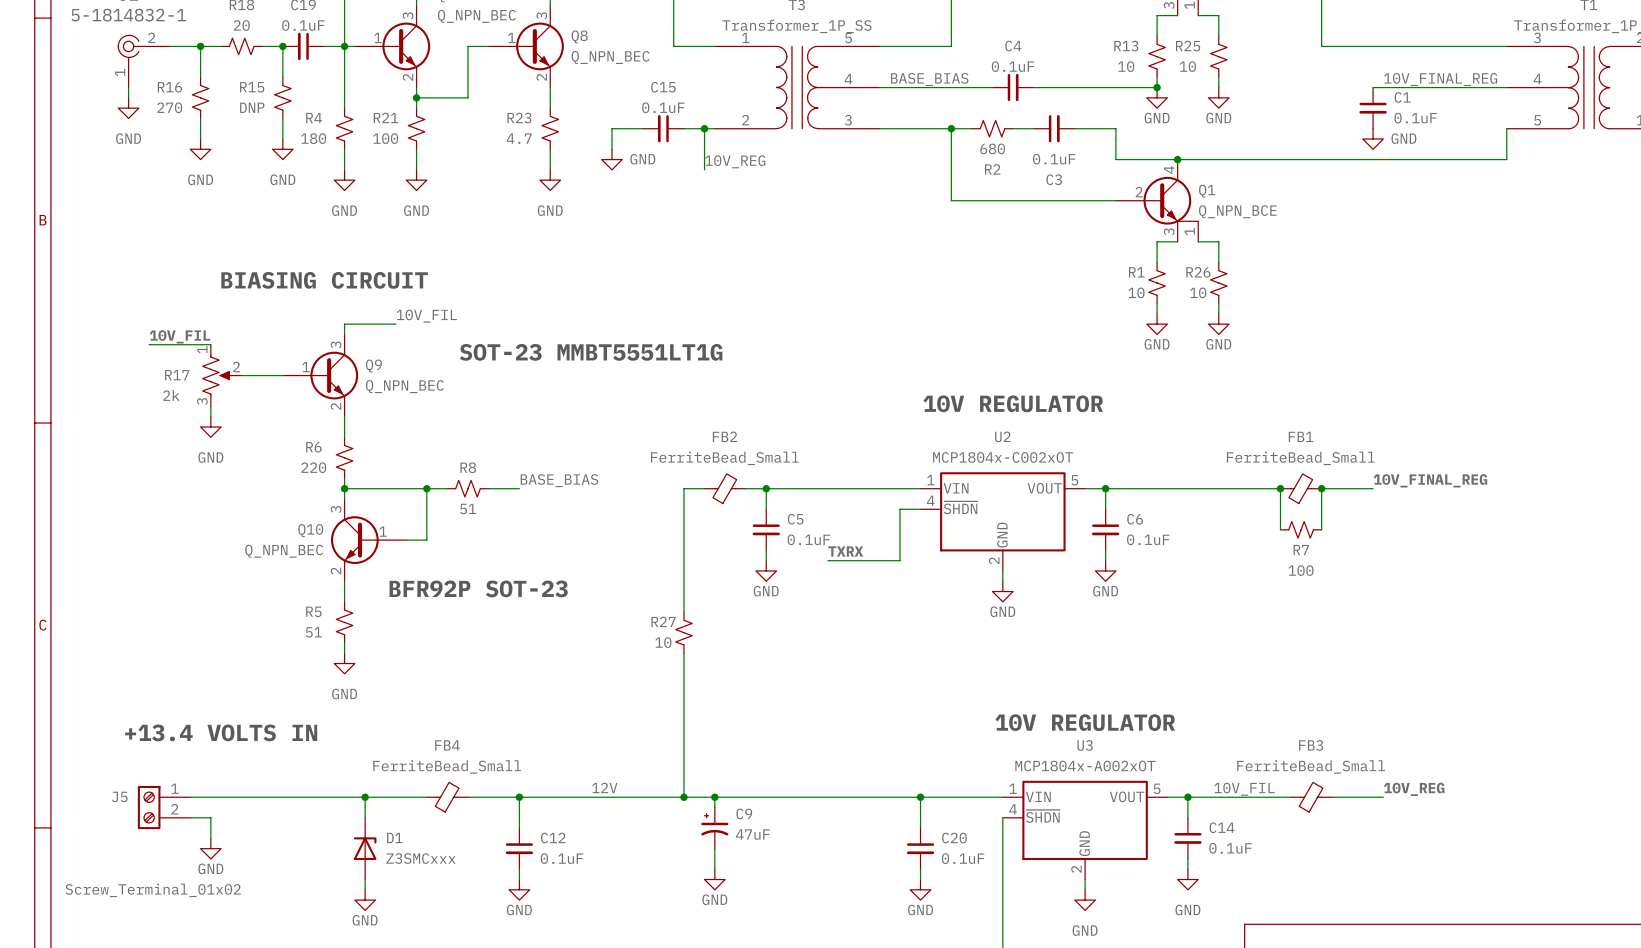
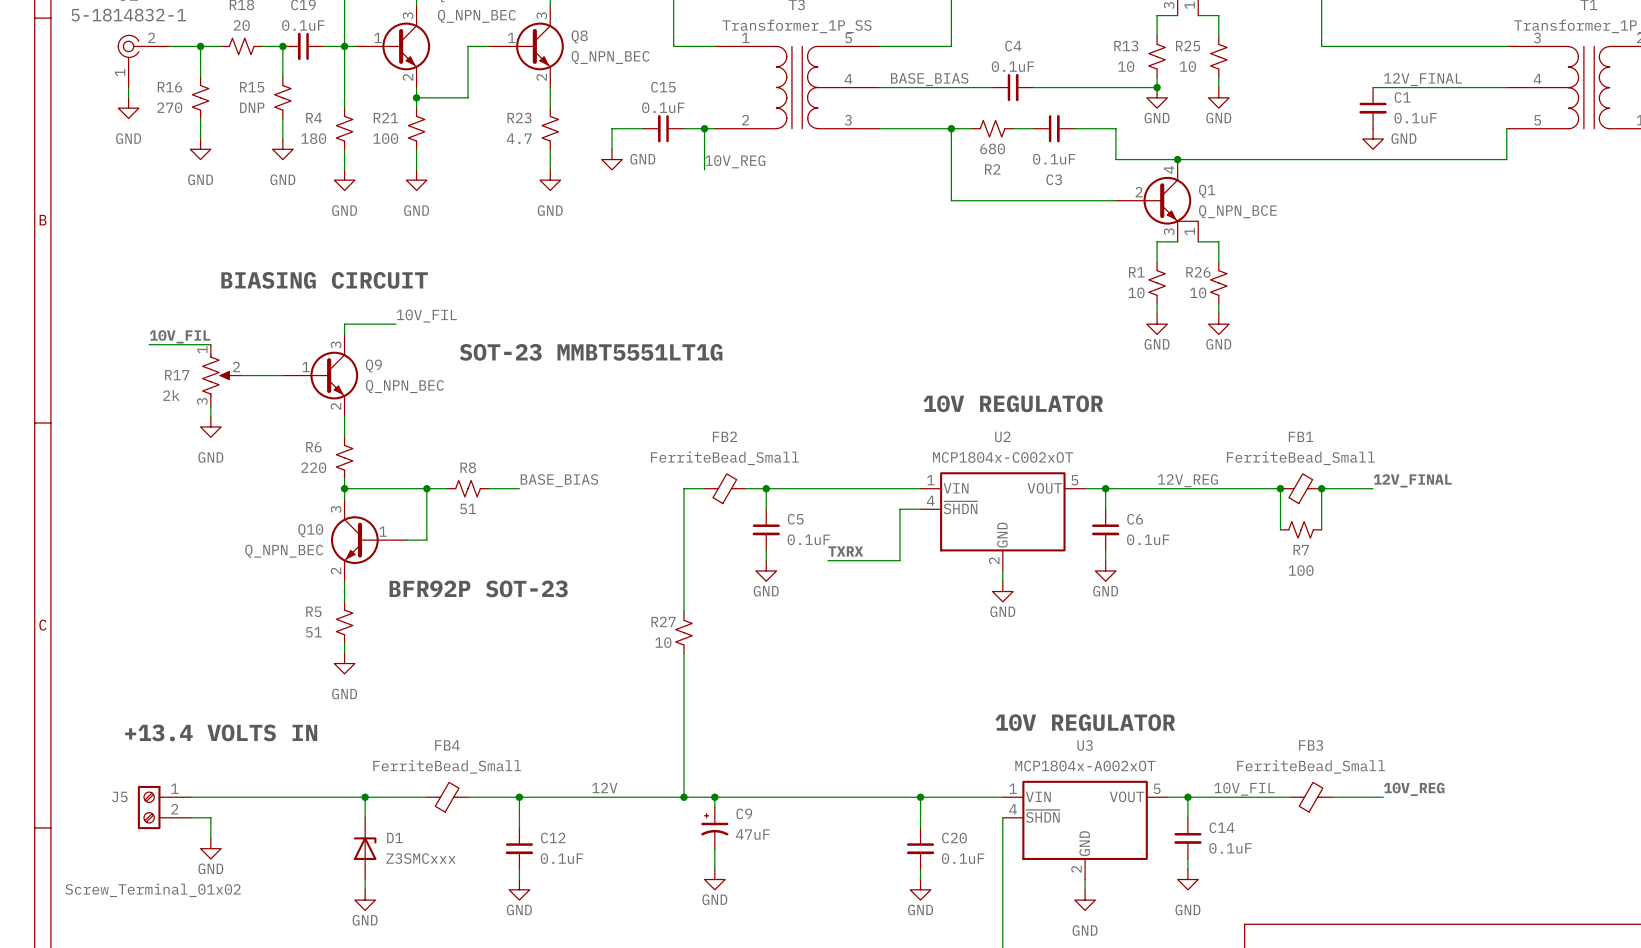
label: 10V_FINAL_REG (1440, 79) -> 12V_FINAL (1423, 79)
label: none -> 12V_REG (1187, 480)
label: 10V_FINAL_REG (1430, 480) -> 12V_FINAL (1412, 480)

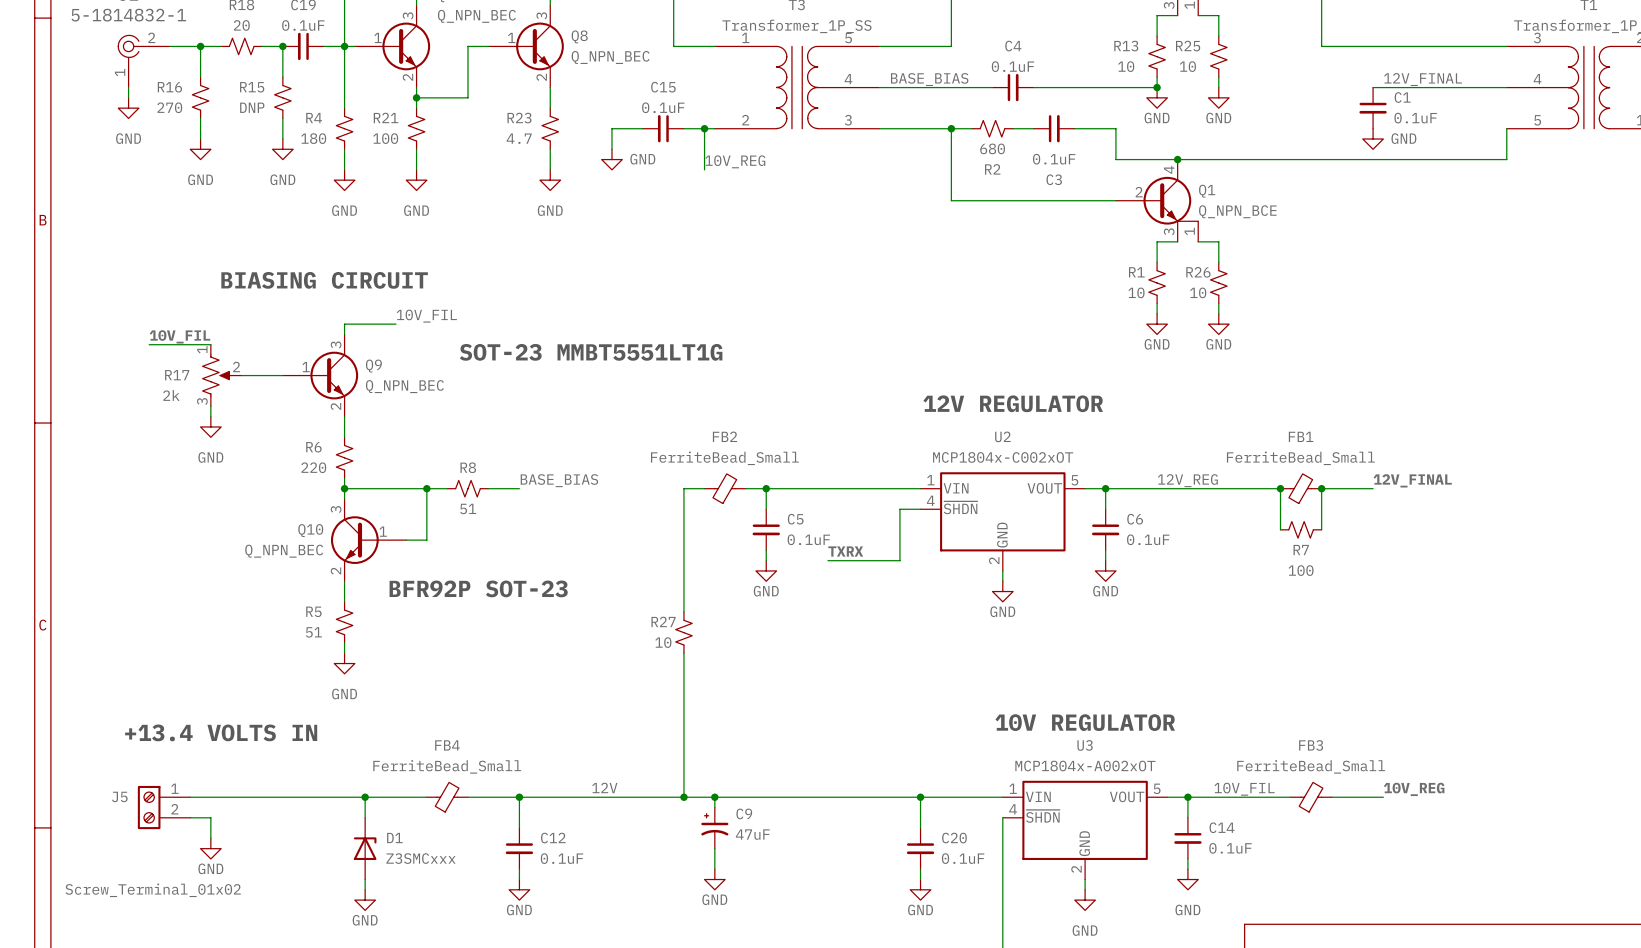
text: 10V REGULATOR (1013, 403) -> 12V REGULATOR (1013, 403)

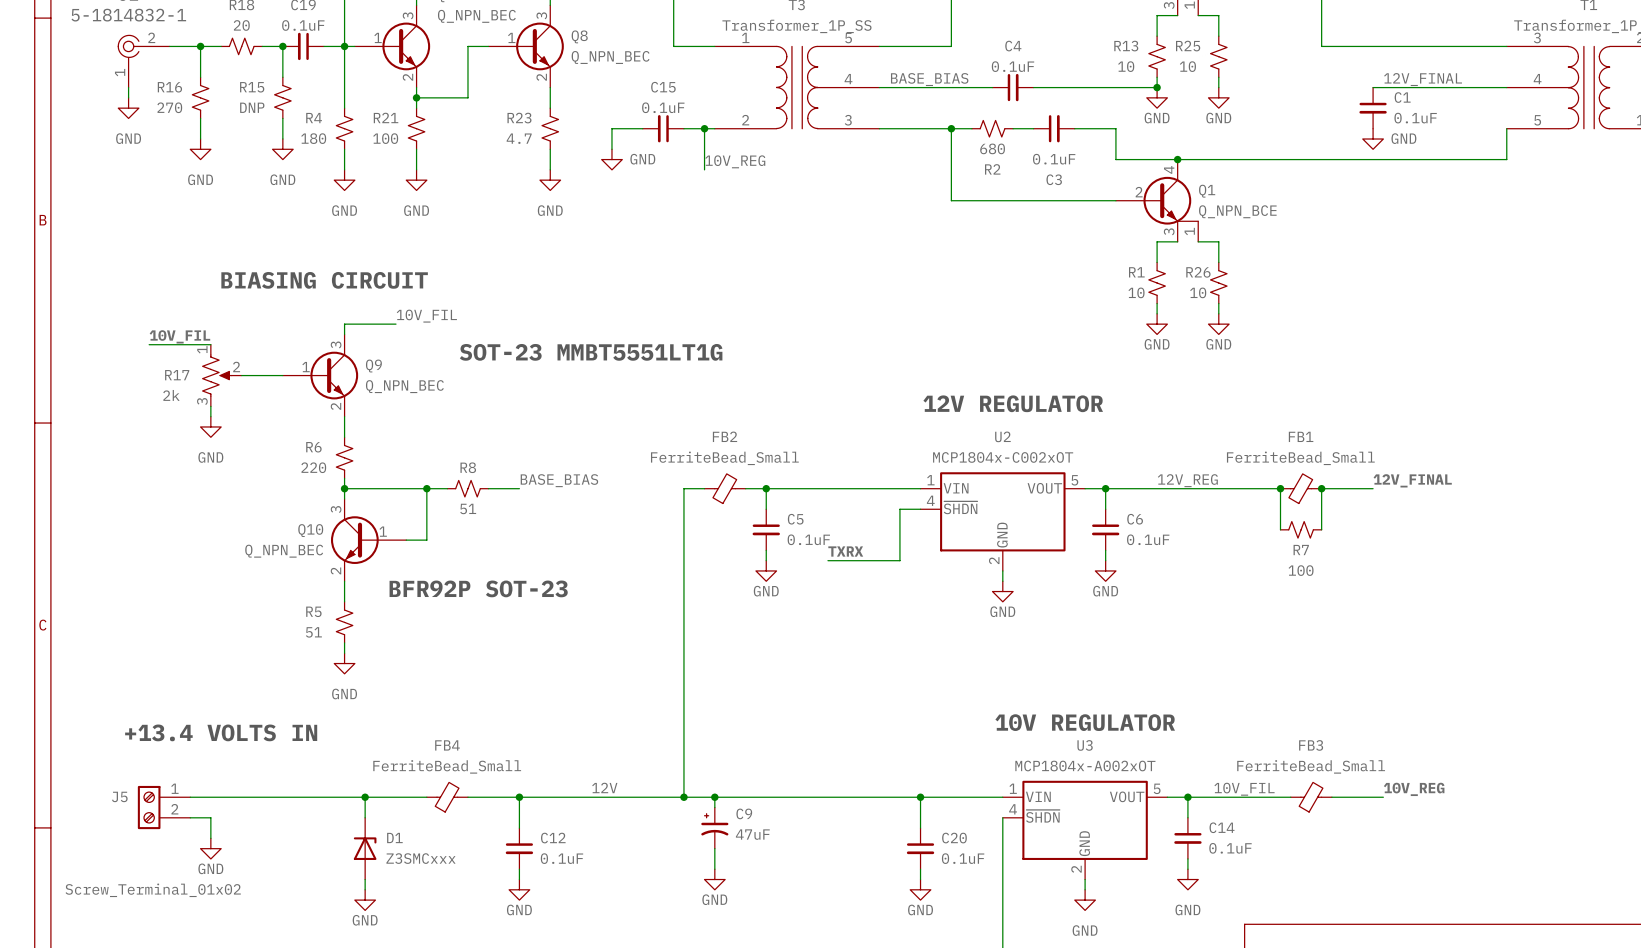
R27: 10 (683, 632) -> none

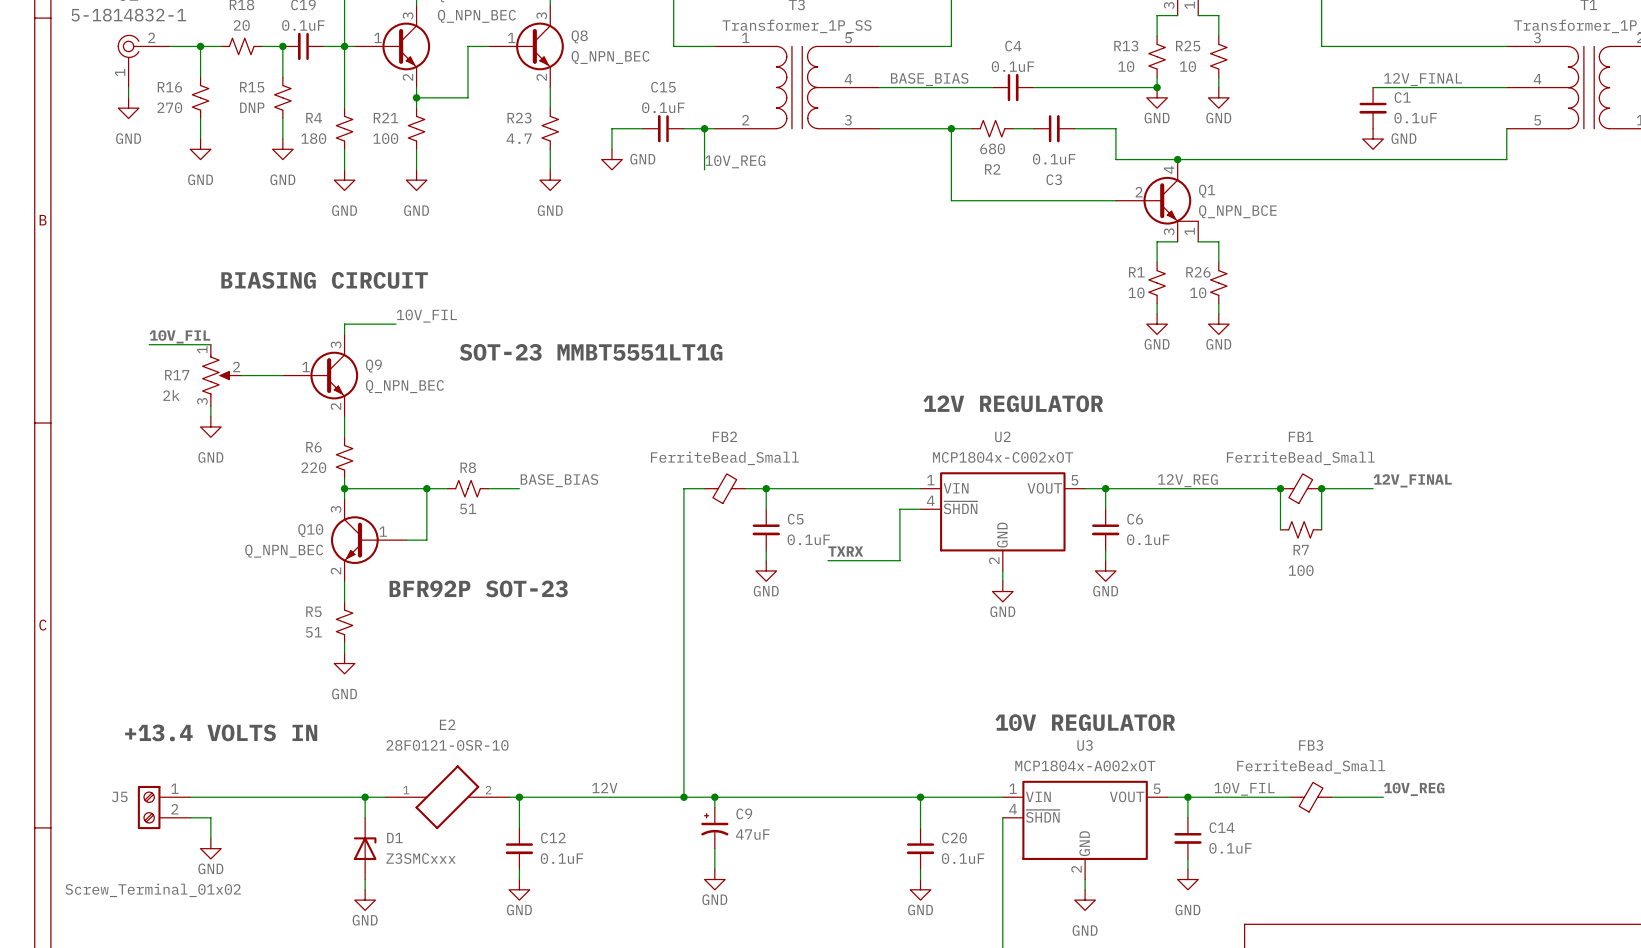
FB4: FerriteBead_Small (447, 797) -> none
E2: none -> 28F0121-0SR-10 (447, 797)

